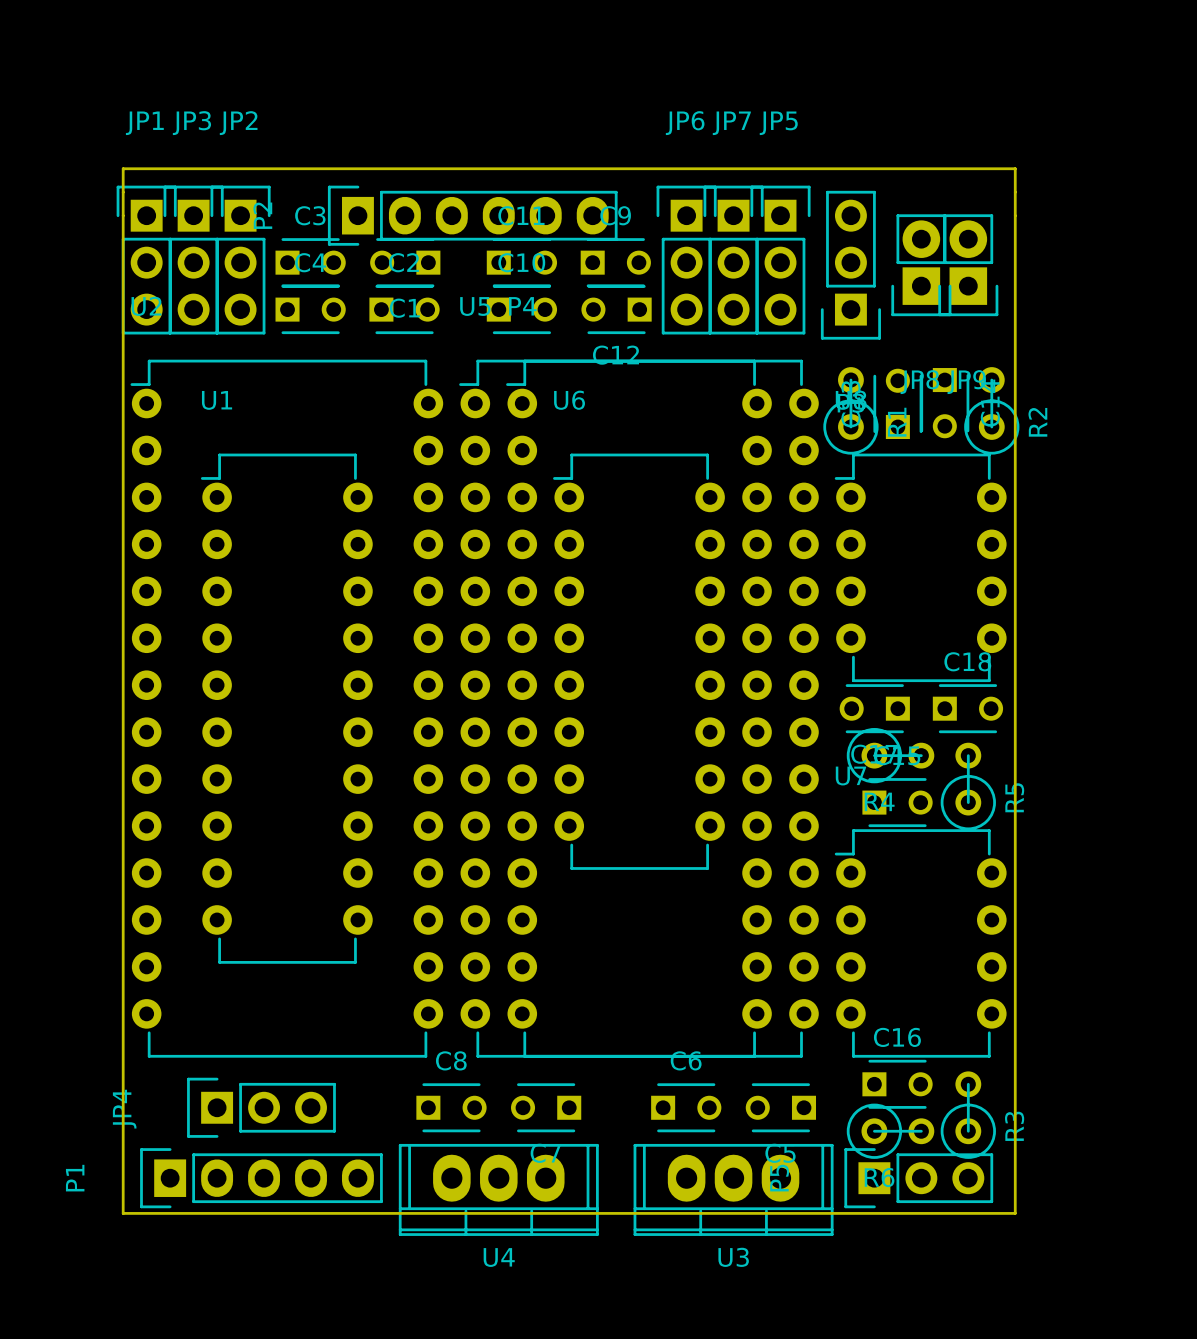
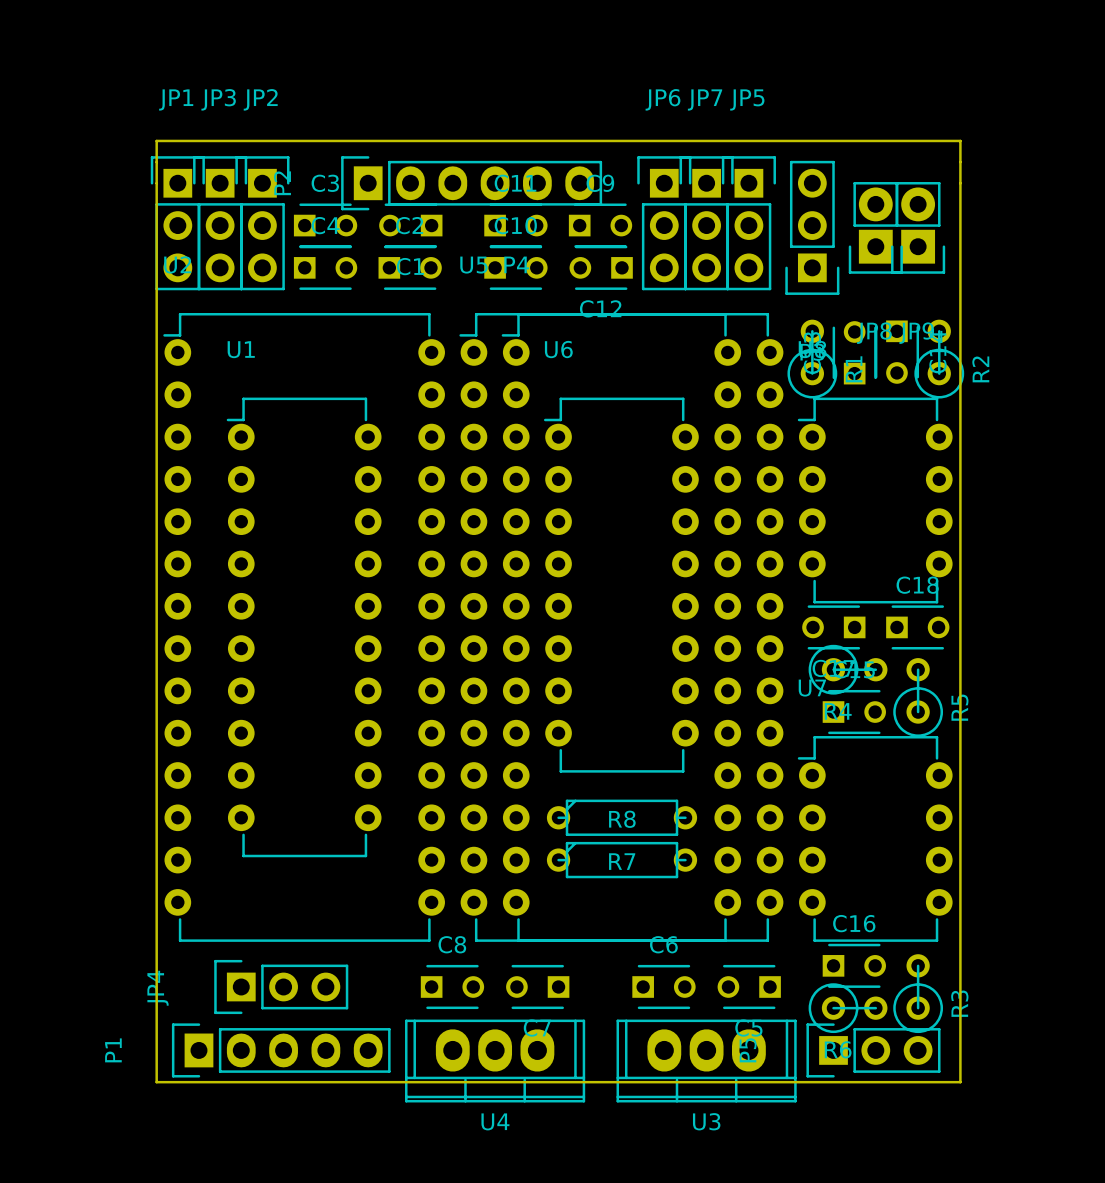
R8: none -> (622, 817)
R7: none -> (622, 860)

